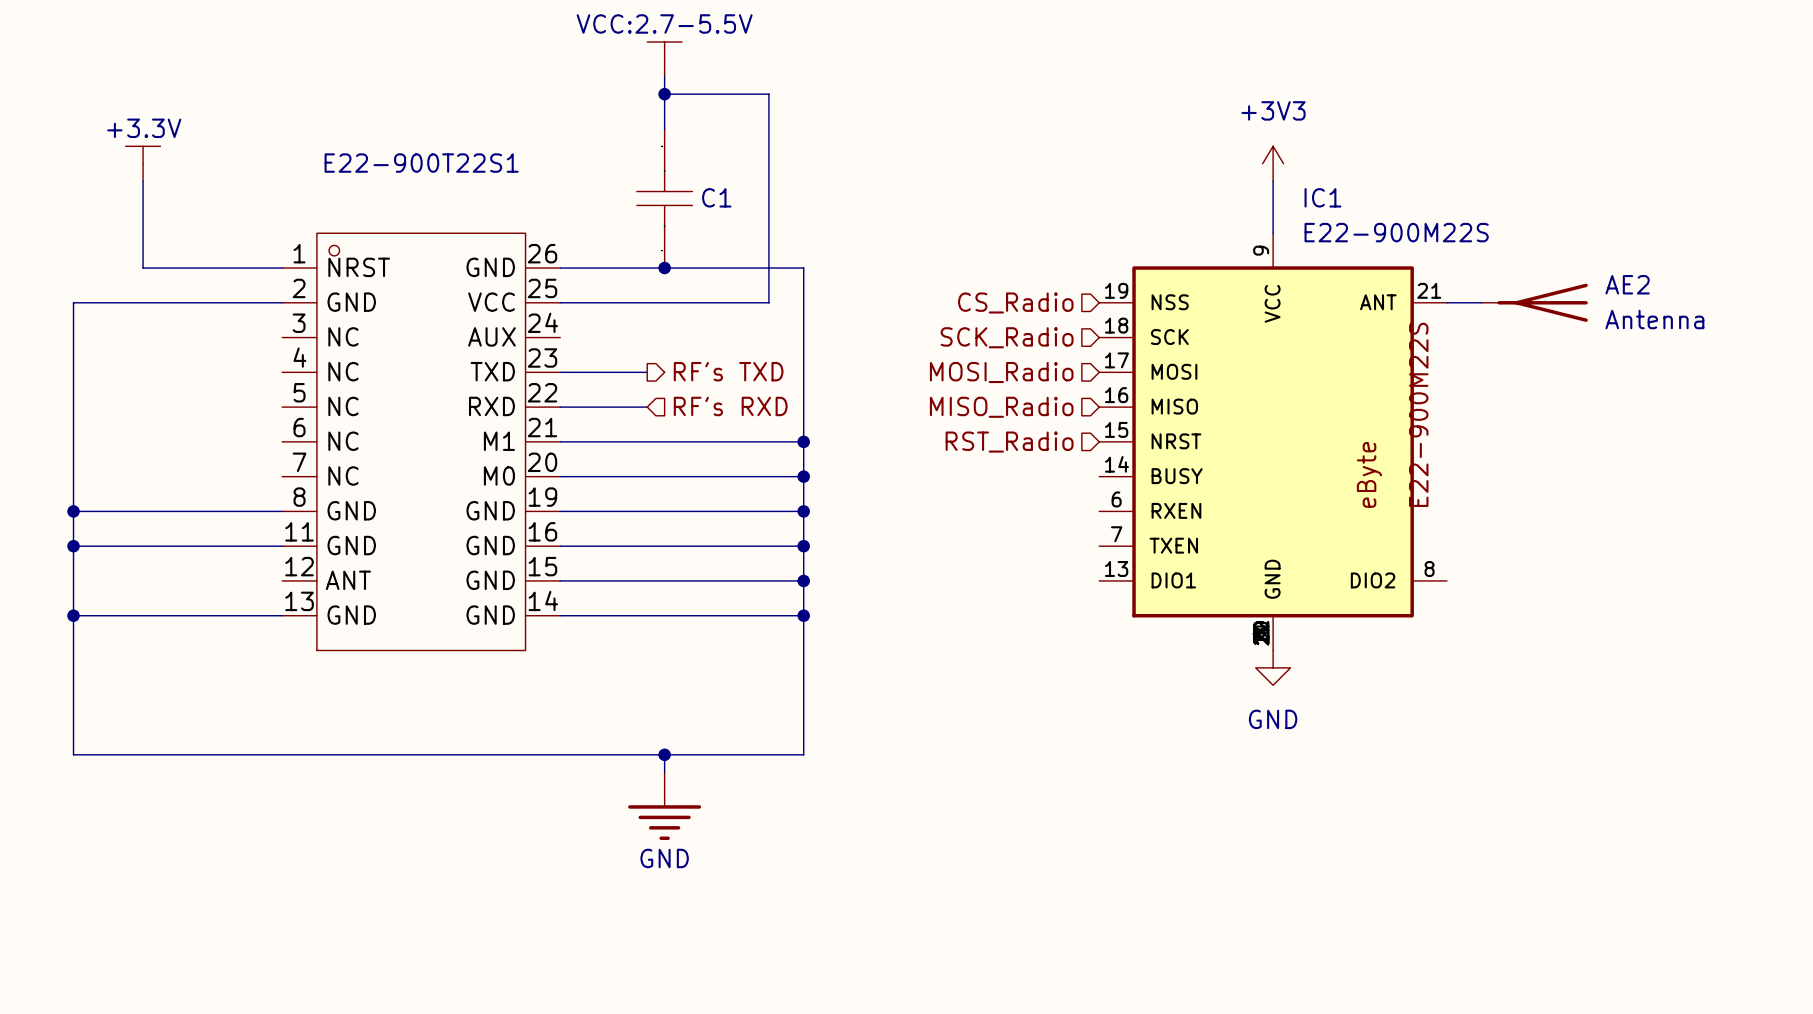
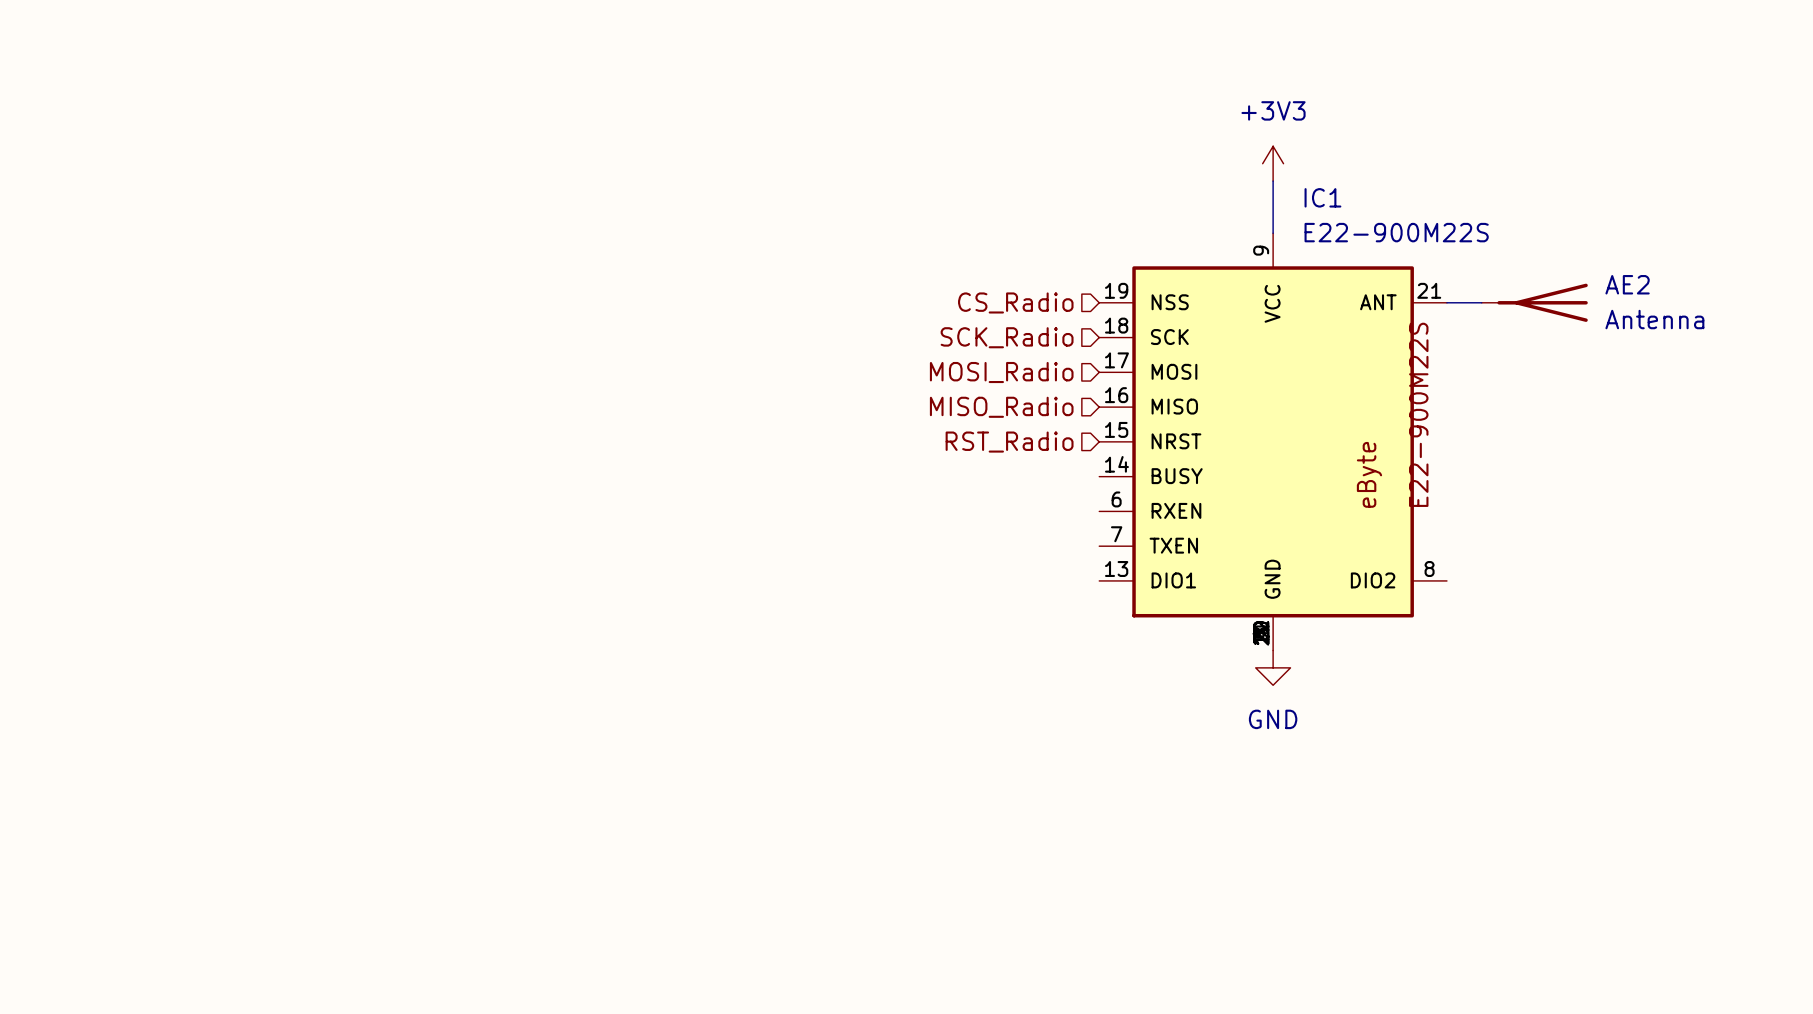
power symbol: VCC:2.7-5.5V (664, 59) -> none
wire: (664, 76) (664, 128) -> none
wire: (664, 94) (768, 94) (768, 302) (560, 302) -> none
junction: (664, 94) -> none
power symbol: +3.3V (143, 163) -> none
wire: (143, 181) (143, 268) (282, 268) -> none
C1: (664, 198) -> none
wire: (560, 268) (803, 268) (803, 754) (73, 754) (73, 302) (282, 302) -> none
junction: (664, 268) -> none
hierarchical label: RF's TXD (728, 371) -> none
wire: (560, 372) (647, 372) -> none
hierarchical label: RF's RXD (730, 406) -> none
wire: (560, 407) (647, 407) -> none
E22-900T22S1: (421, 441) -> none
wire: (560, 441) (803, 441) -> none
junction: (803, 441) -> none
wire: (560, 476) (803, 476) -> none
junction: (803, 476) -> none
wire: (73, 511) (282, 511) -> none
junction: (73, 511) -> none
wire: (560, 511) (803, 511) -> none
junction: (803, 511) -> none
wire: (73, 546) (282, 546) -> none
junction: (73, 546) -> none
wire: (560, 546) (803, 546) -> none
junction: (803, 546) -> none
wire: (560, 580) (803, 580) -> none
junction: (803, 580) -> none
wire: (73, 615) (282, 615) -> none
junction: (73, 615) -> none
wire: (560, 615) (803, 615) -> none
junction: (803, 615) -> none
wire: (664, 754) (664, 772) -> none
junction: (664, 754) -> none
power symbol: GND (664, 806) -> none

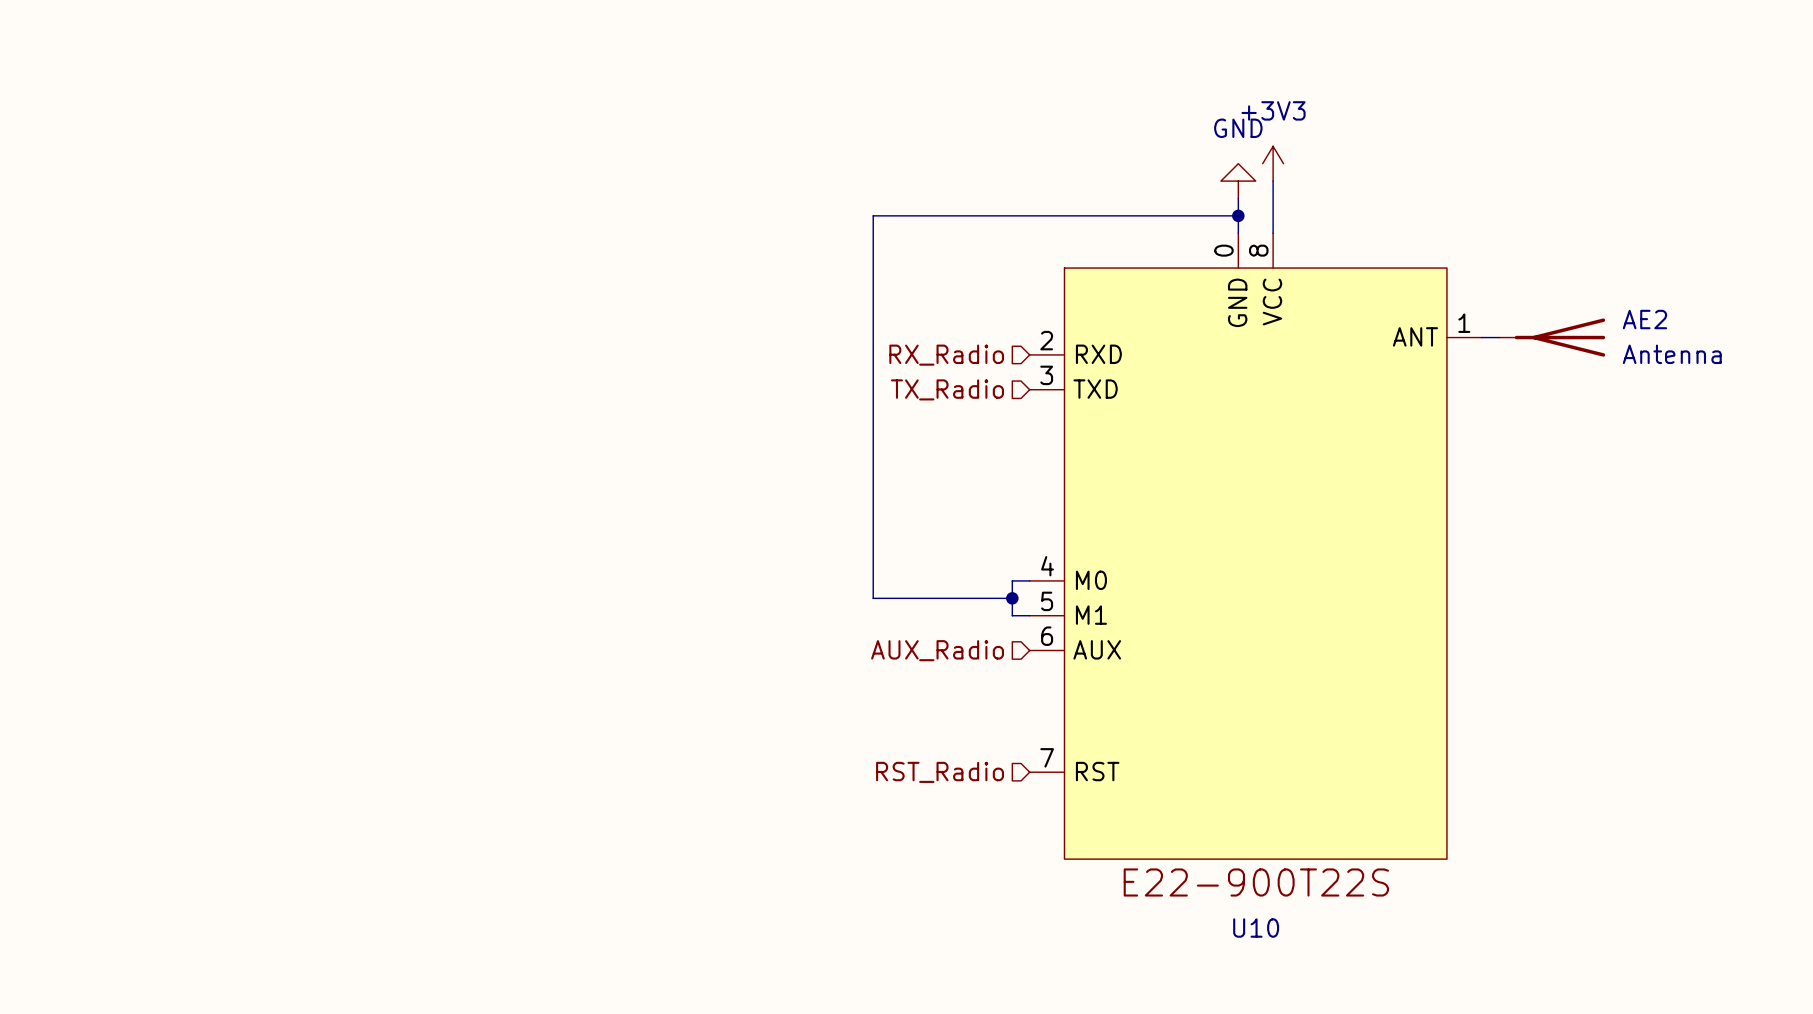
power symbol: none -> GND (1238, 181)
wire: none -> (1238, 198) (1238, 233)
wire: none -> (1238, 215) (873, 215) (873, 598) (1012, 598)
junction: none -> (1238, 215)
hierarchical label: CS_Radio (1015, 302) -> none
wire: (1446, 302) (1481, 302) -> none
AE2 position: (1534, 302) -> (1552, 337)
hierarchical label: SCK_Radio (1007, 337) -> none
wire: none -> (1481, 337) (1499, 337)
hierarchical label: none -> RX_Radio (946, 355)
hierarchical label: MOSI_Radio (1001, 372) -> none
hierarchical label: none -> TX_Radio (947, 389)
hierarchical label: MISO_Radio (1001, 407) -> none
IC1: E22-900M22S (1273, 441) -> none
hierarchical label position: RST_Radio (1009, 442) -> RST_Radio (940, 772)
U10: none -> (1255, 546)
wire: none -> (1029, 580) (1012, 580) (1012, 615) (1029, 615)
junction: none -> (1012, 598)
hierarchical label: none -> AUX_Radio (937, 650)
power symbol: GND (1273, 667) -> none

